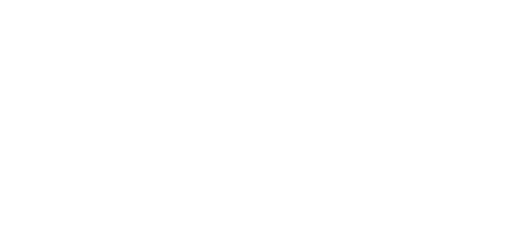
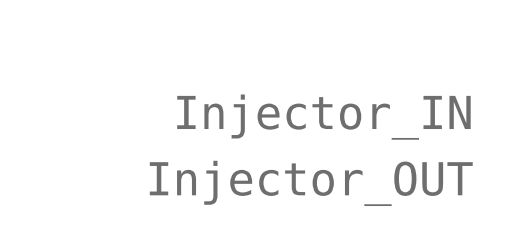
label: none -> Injector_IN (323, 117)
label: none -> Injector_OUT (311, 183)

